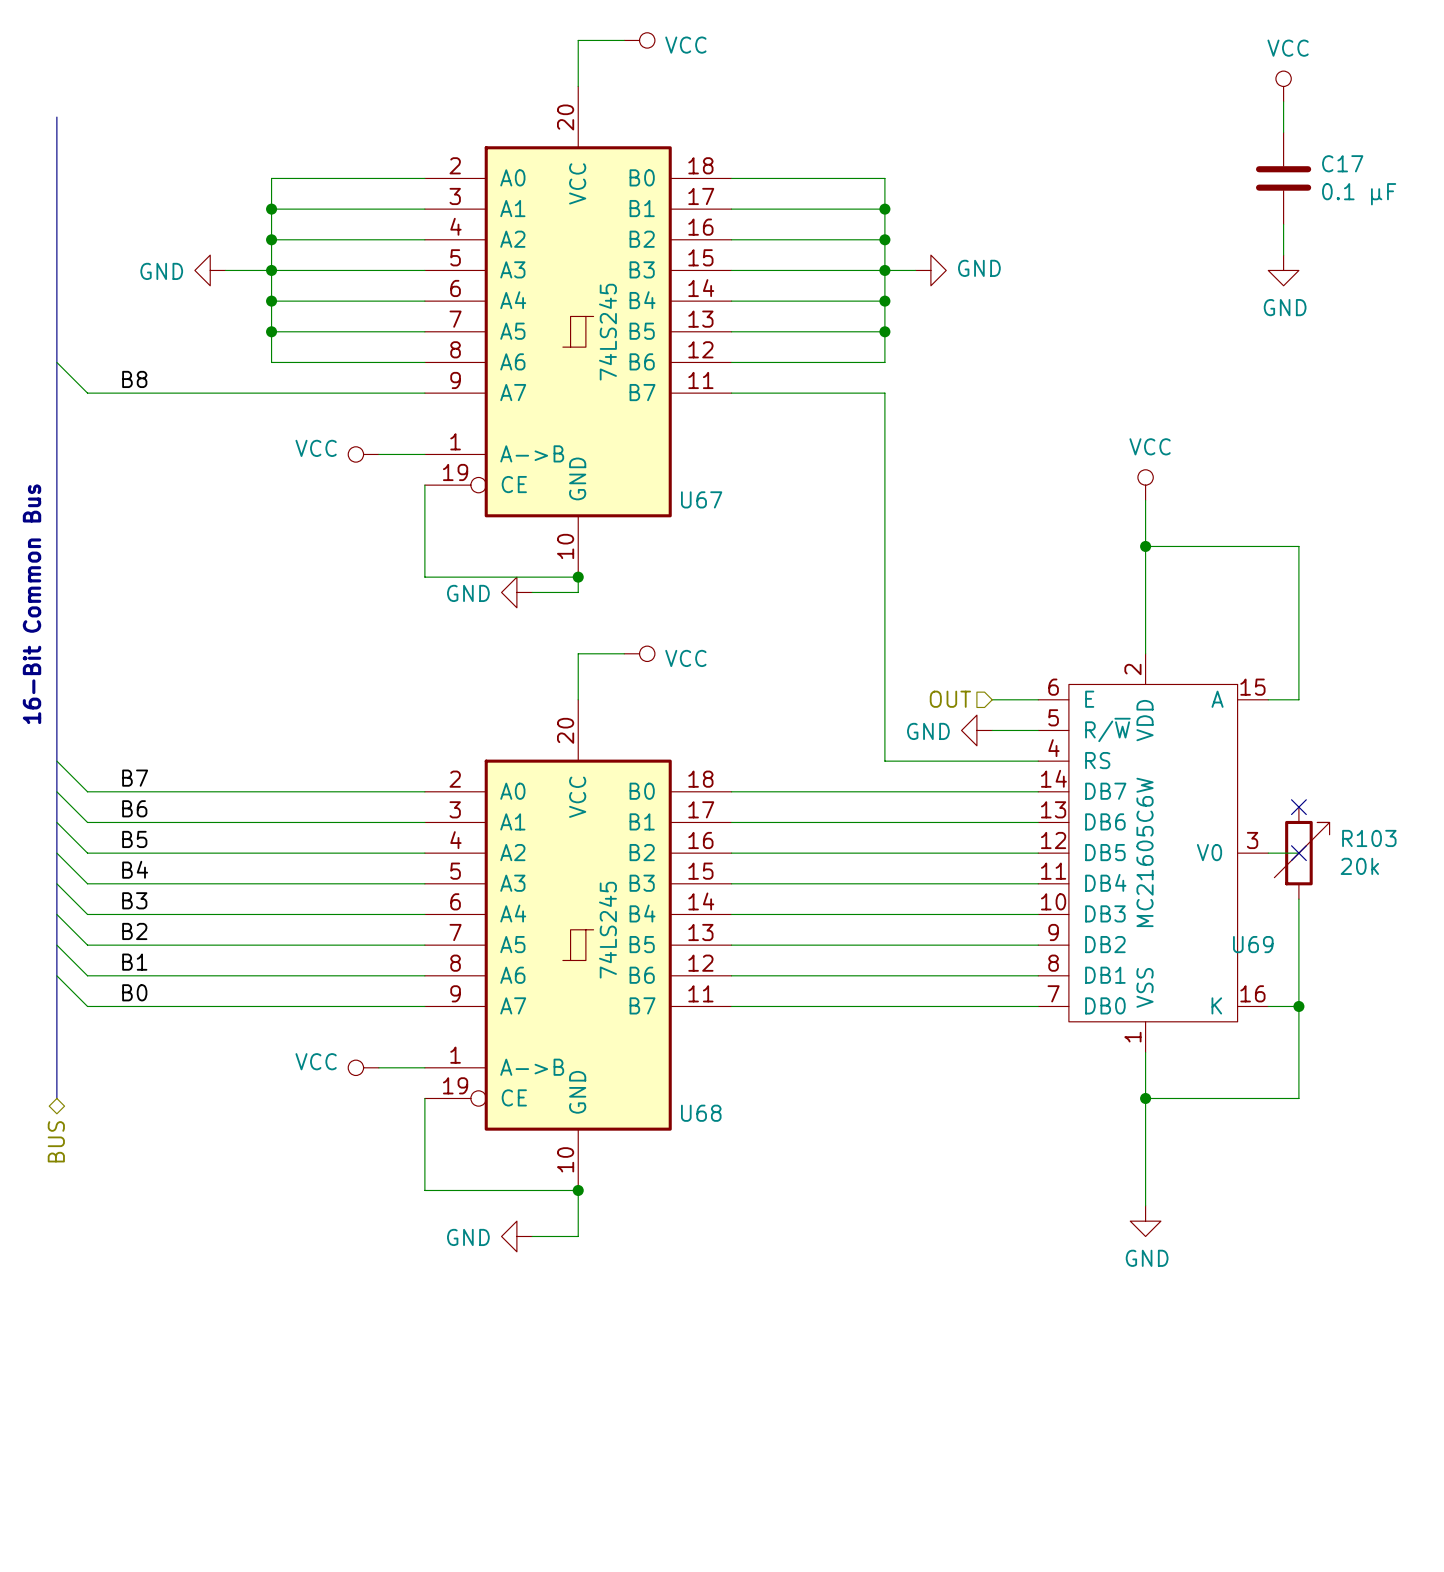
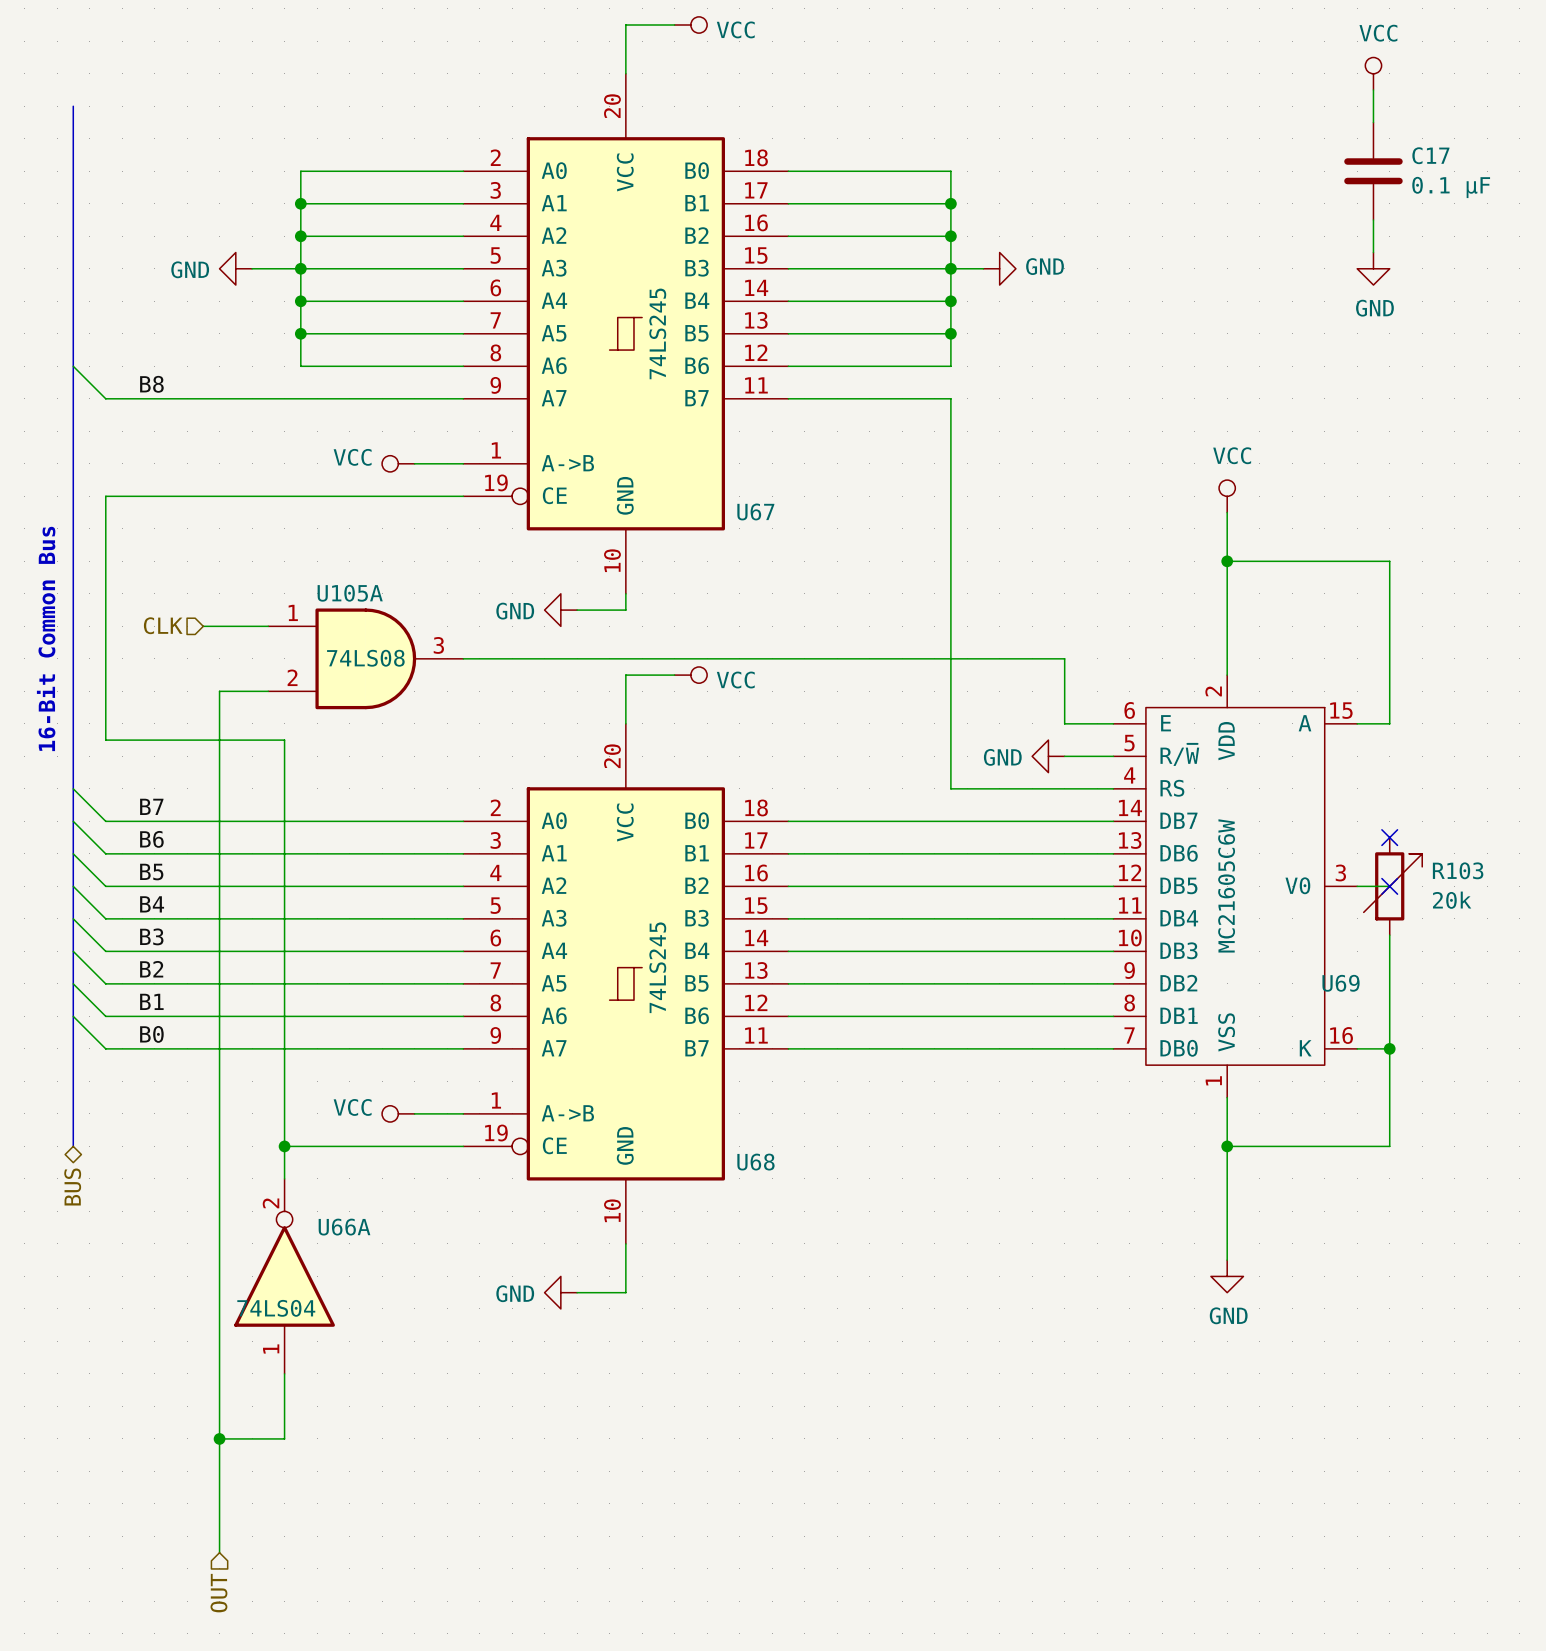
wire: (424, 485) (424, 577) (578, 577) -> (463, 496) (105, 496) (105, 740) (284, 740) (284, 1178)
junction: (578, 577) -> none
hierarchical label: none -> CLK (163, 625)
wire: none -> (203, 626) (268, 626)
U105A: none -> 74LS08 (365, 658)
wire: none -> (463, 658) (1064, 658) (1064, 723)
wire: none -> (268, 691) (219, 691) (219, 1552)
hierarchical label: OUT (950, 699) -> none
junction: none -> (284, 1146)
wire: (424, 1098) (424, 1190) (578, 1190) -> (463, 1146) (284, 1146)
junction: (578, 1190) -> none
U66A: none -> 74LS04 (284, 1276)
wire: none -> (284, 1373) (284, 1438) (219, 1438)
junction: none -> (219, 1438)
hierarchical label: none -> OUT (218, 1593)

